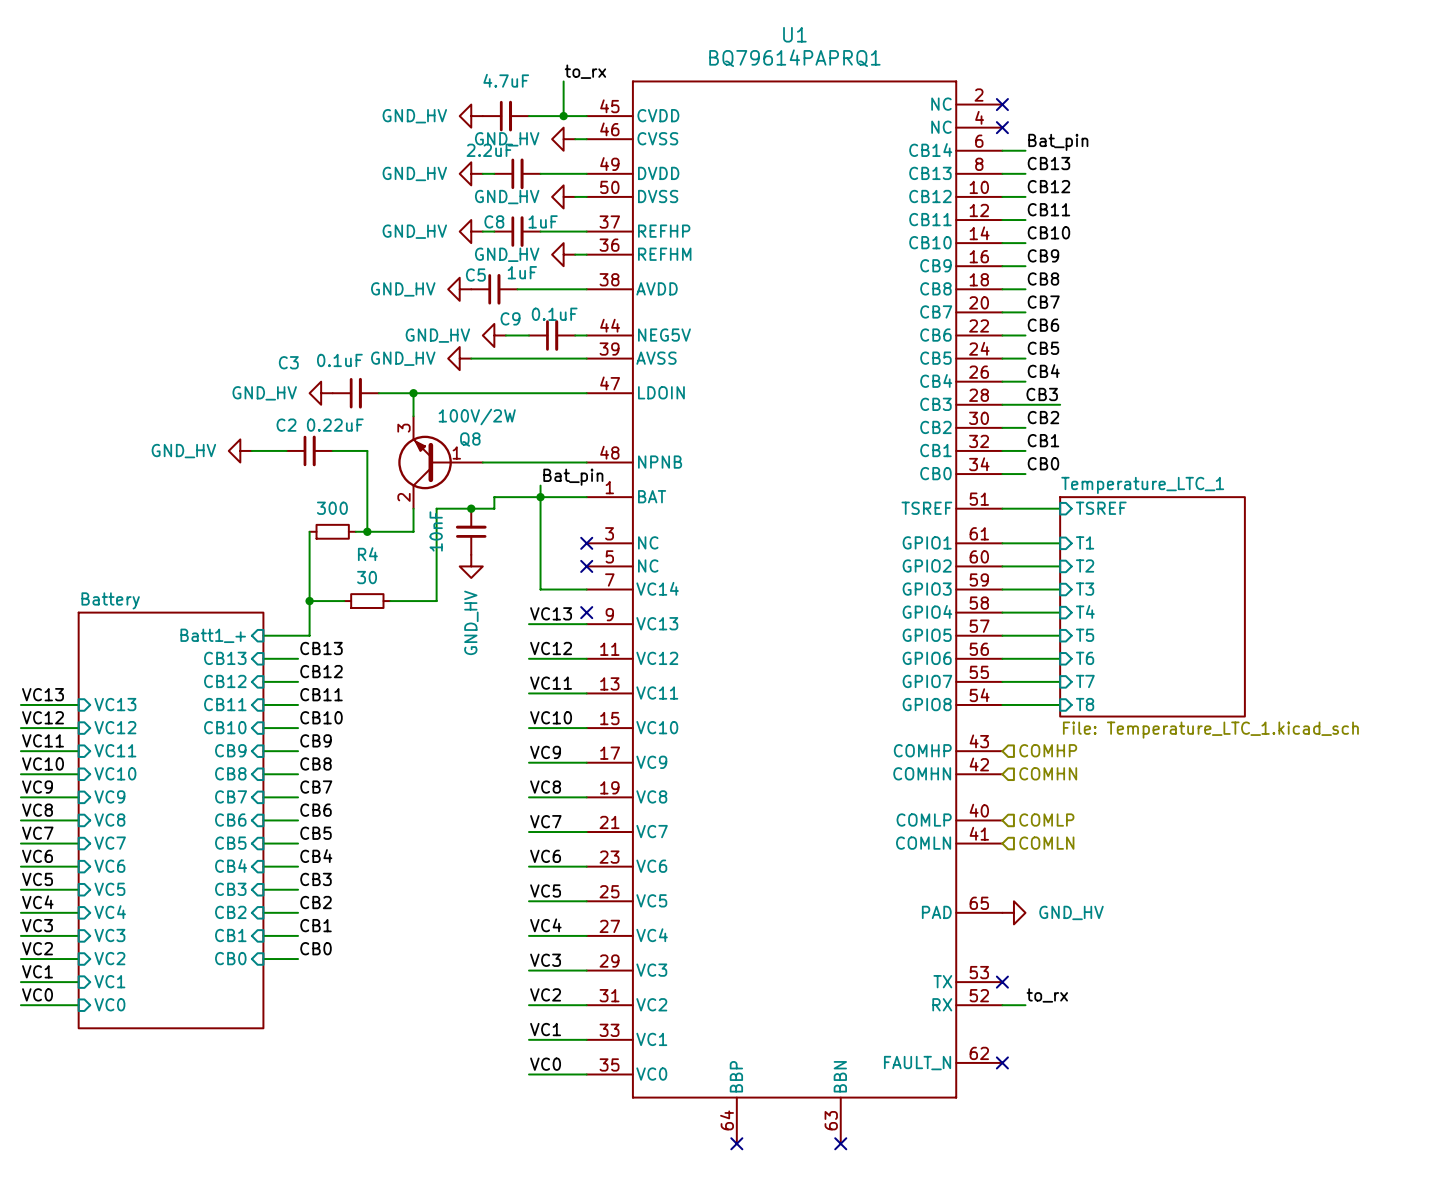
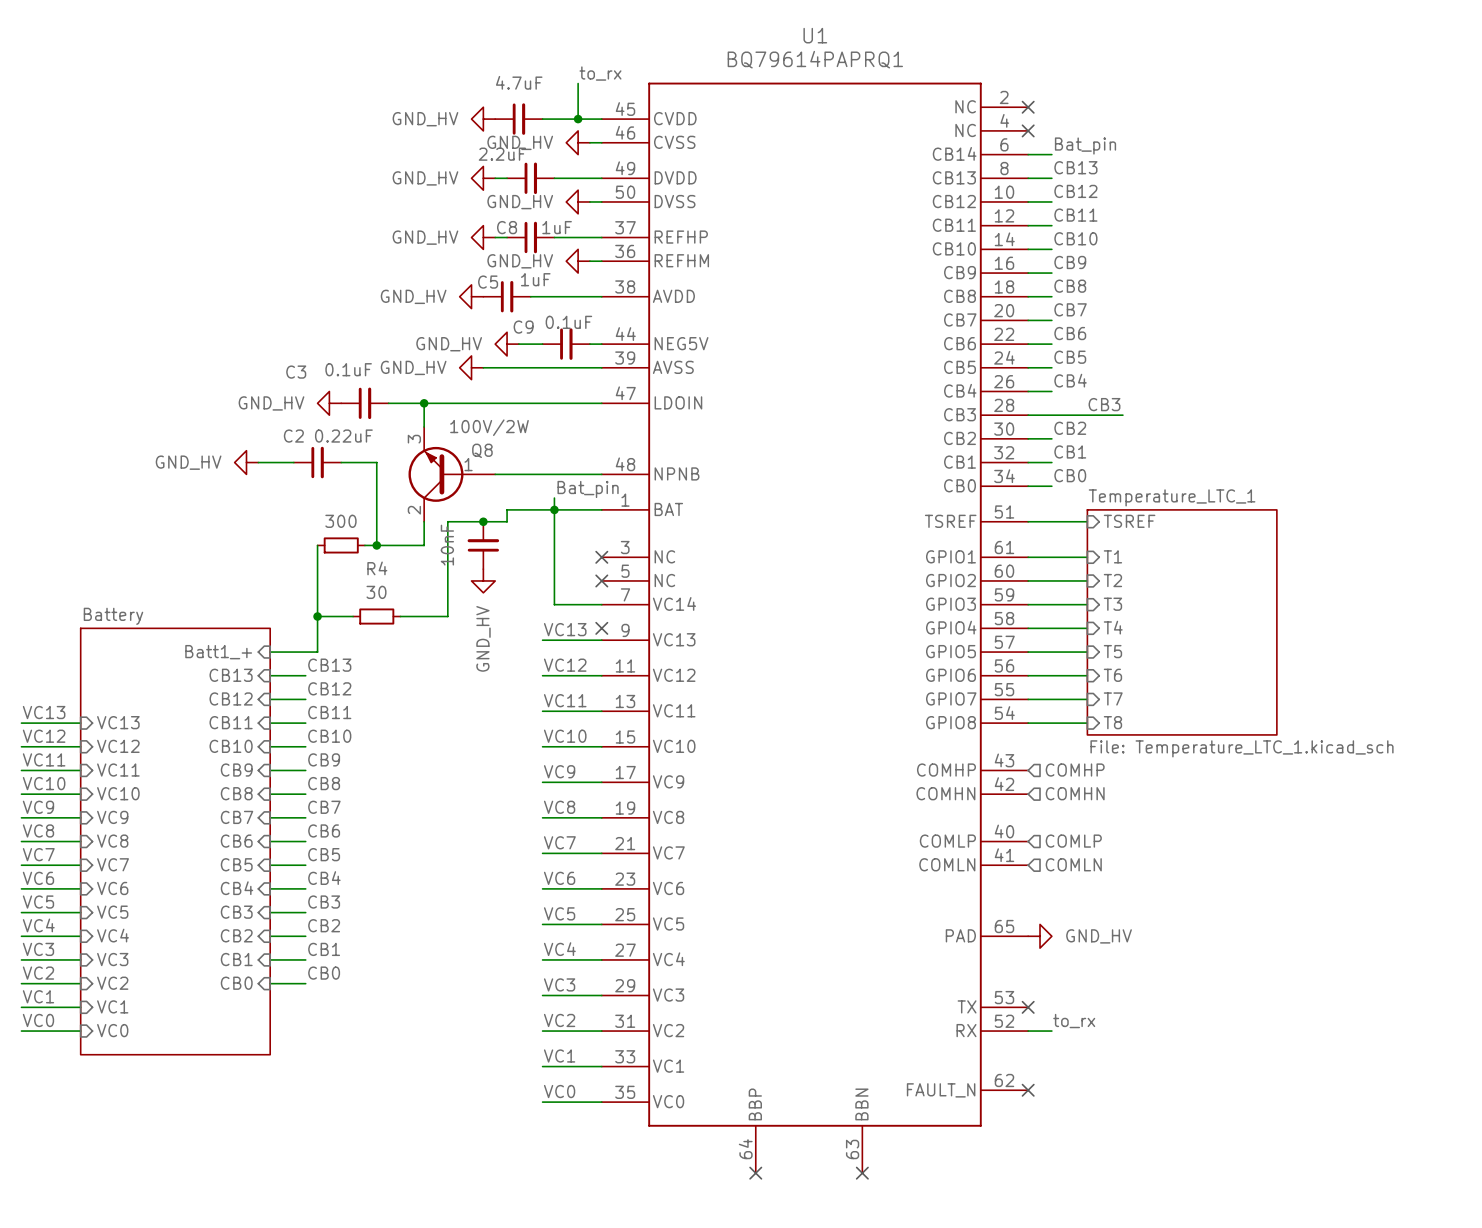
label position: CB3 (1042, 394) -> CB3 (1104, 404)
wire: none -> (1087, 415) (1122, 415)

